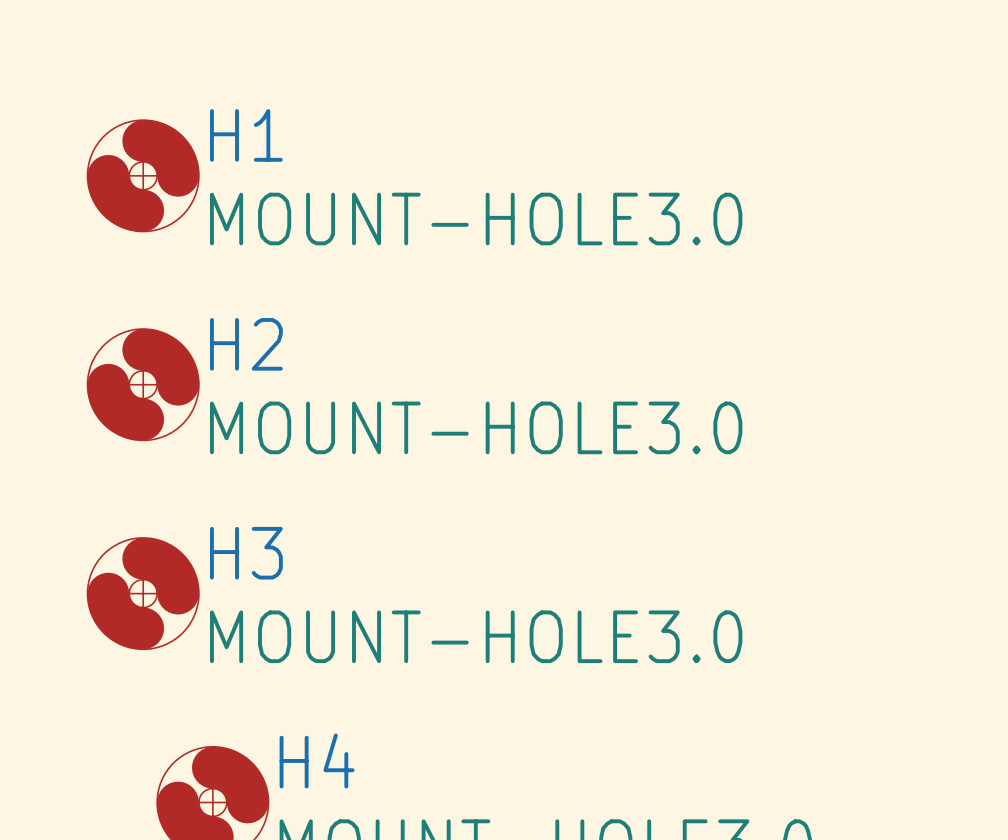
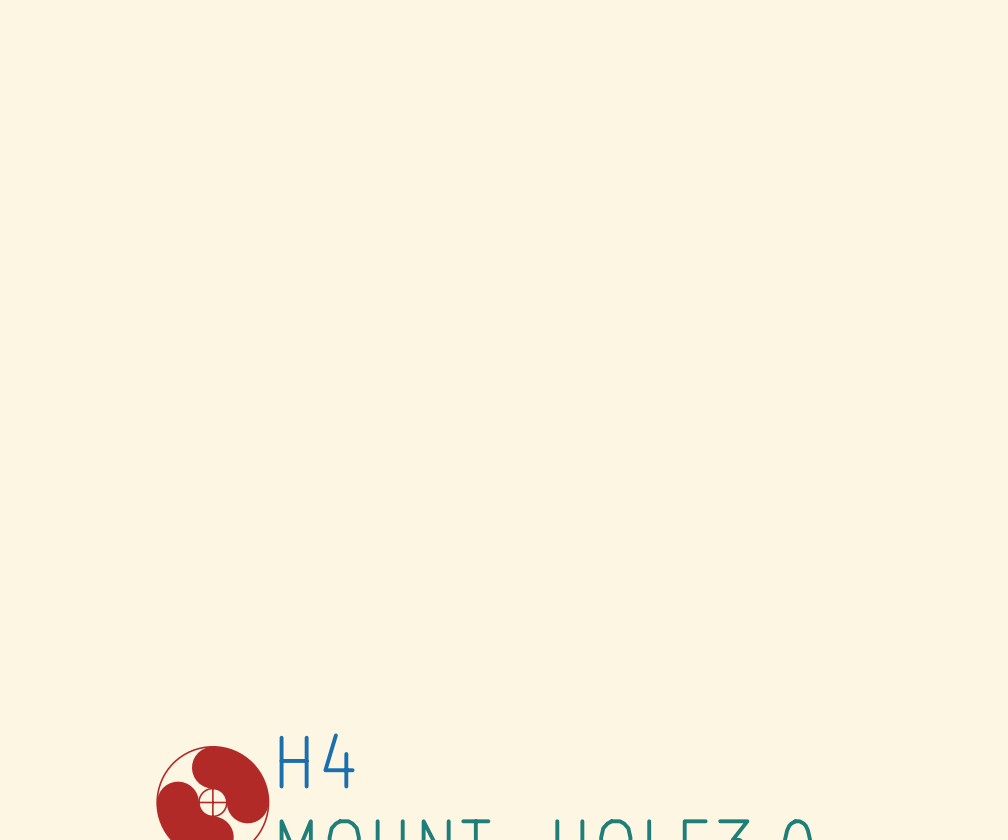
H1: MOUNT-HOLE3.0 (143, 175) -> none
H2: MOUNT-HOLE3.0 (143, 384) -> none
H3: MOUNT-HOLE3.0 (143, 593) -> none

